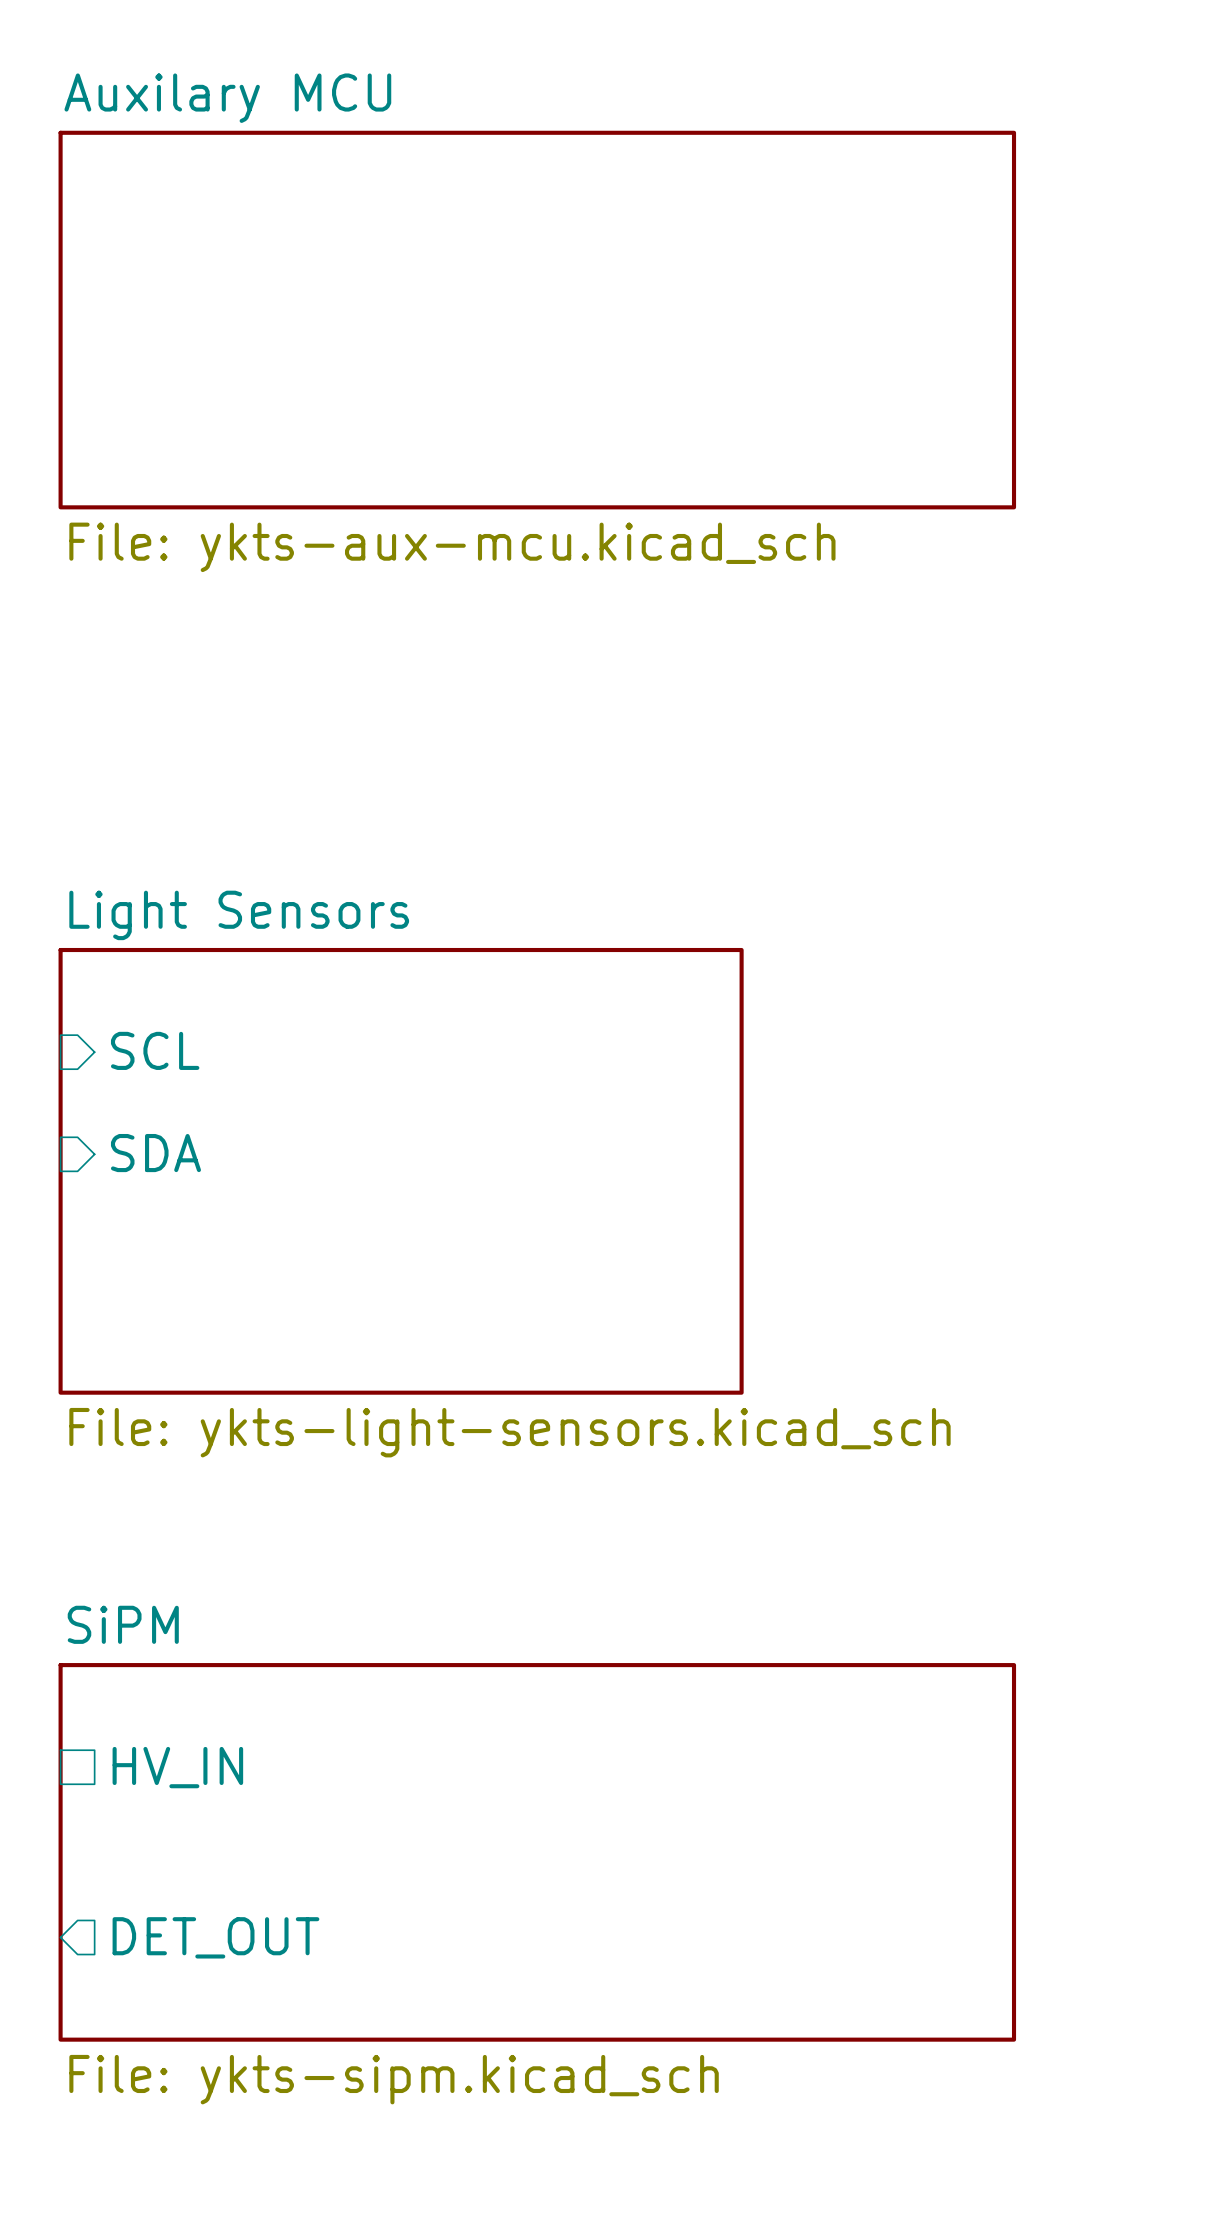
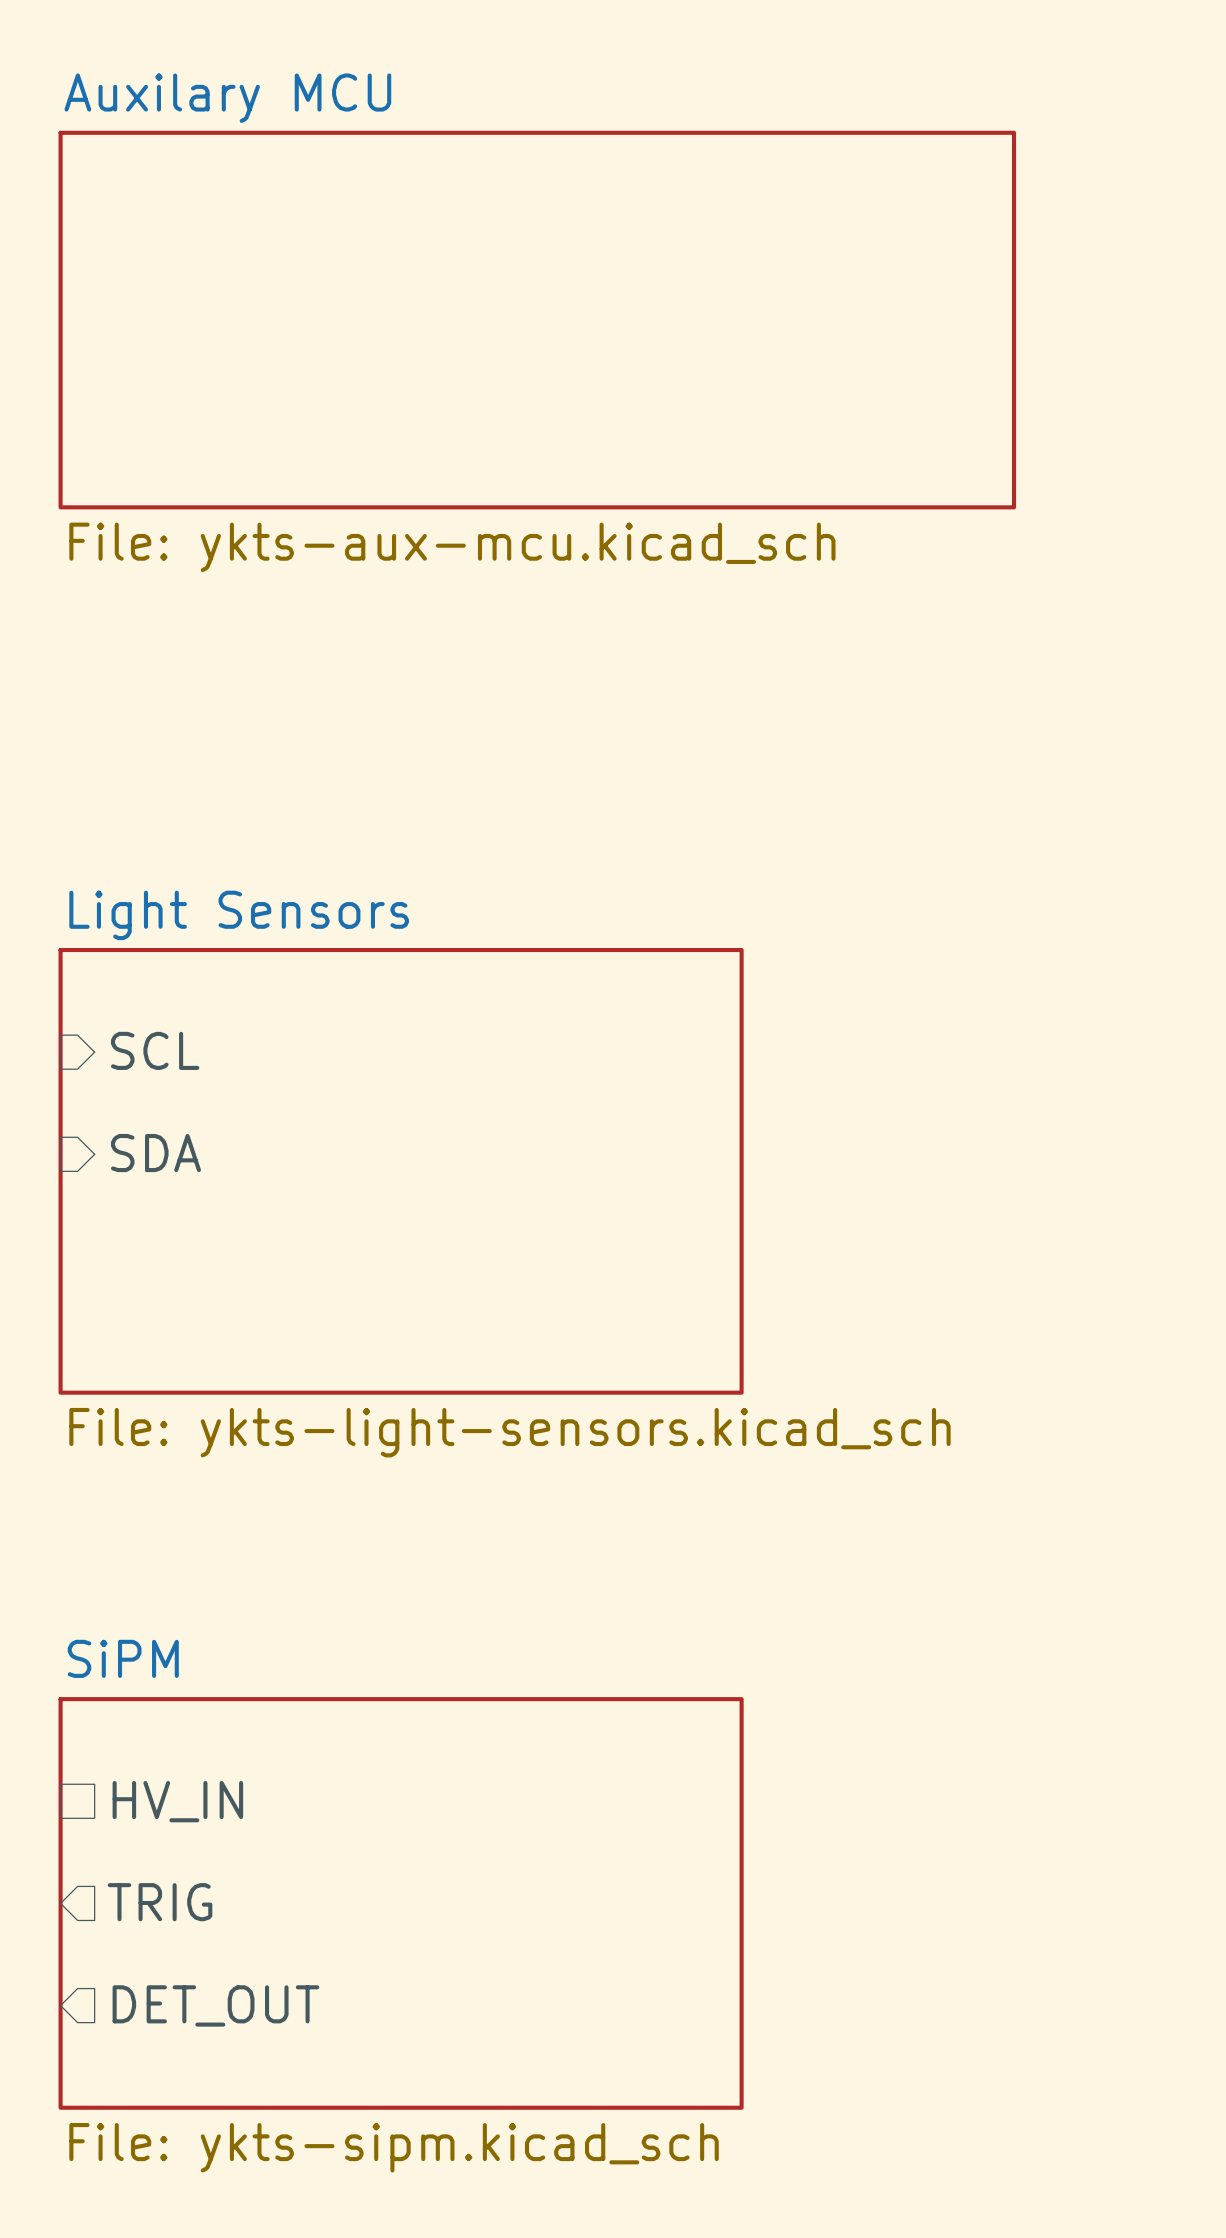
sheet pin position: HV_IN (177, 1767) -> HV_IN (177, 1801)
sheet SiPM: File: ykts-sipm.kicad_sch (537, 1852) -> none
sheet pin: none -> TRIG (160, 1902)
sheet SiPM: none -> File: ykts-sipm.kicad_sch (401, 1903)
sheet pin position: DET_OUT (215, 1937) -> DET_OUT (215, 2005)

